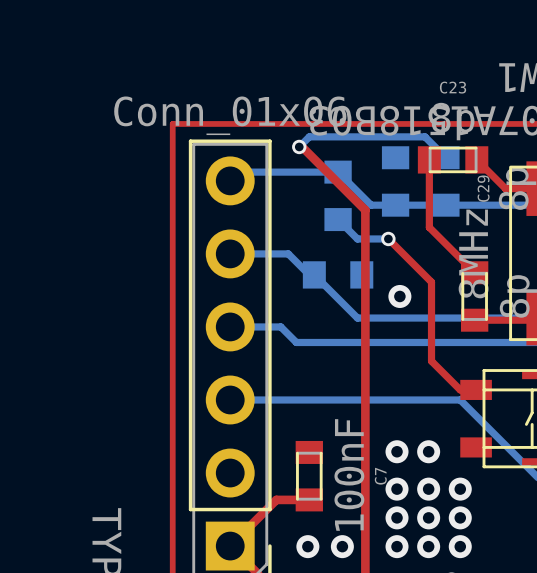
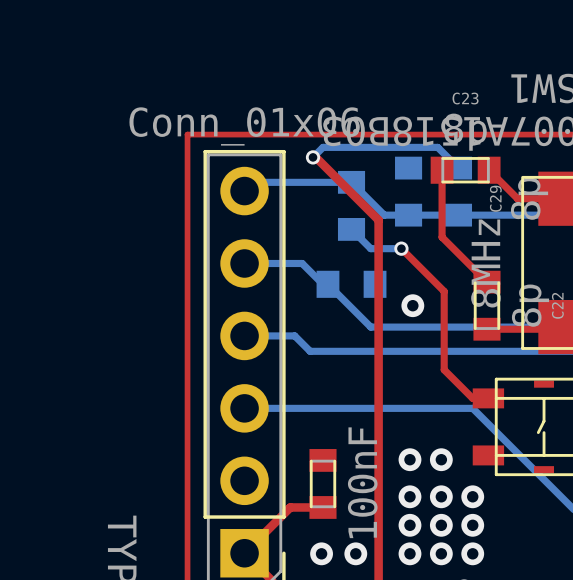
C7 name: C7 (380, 476) -> none

